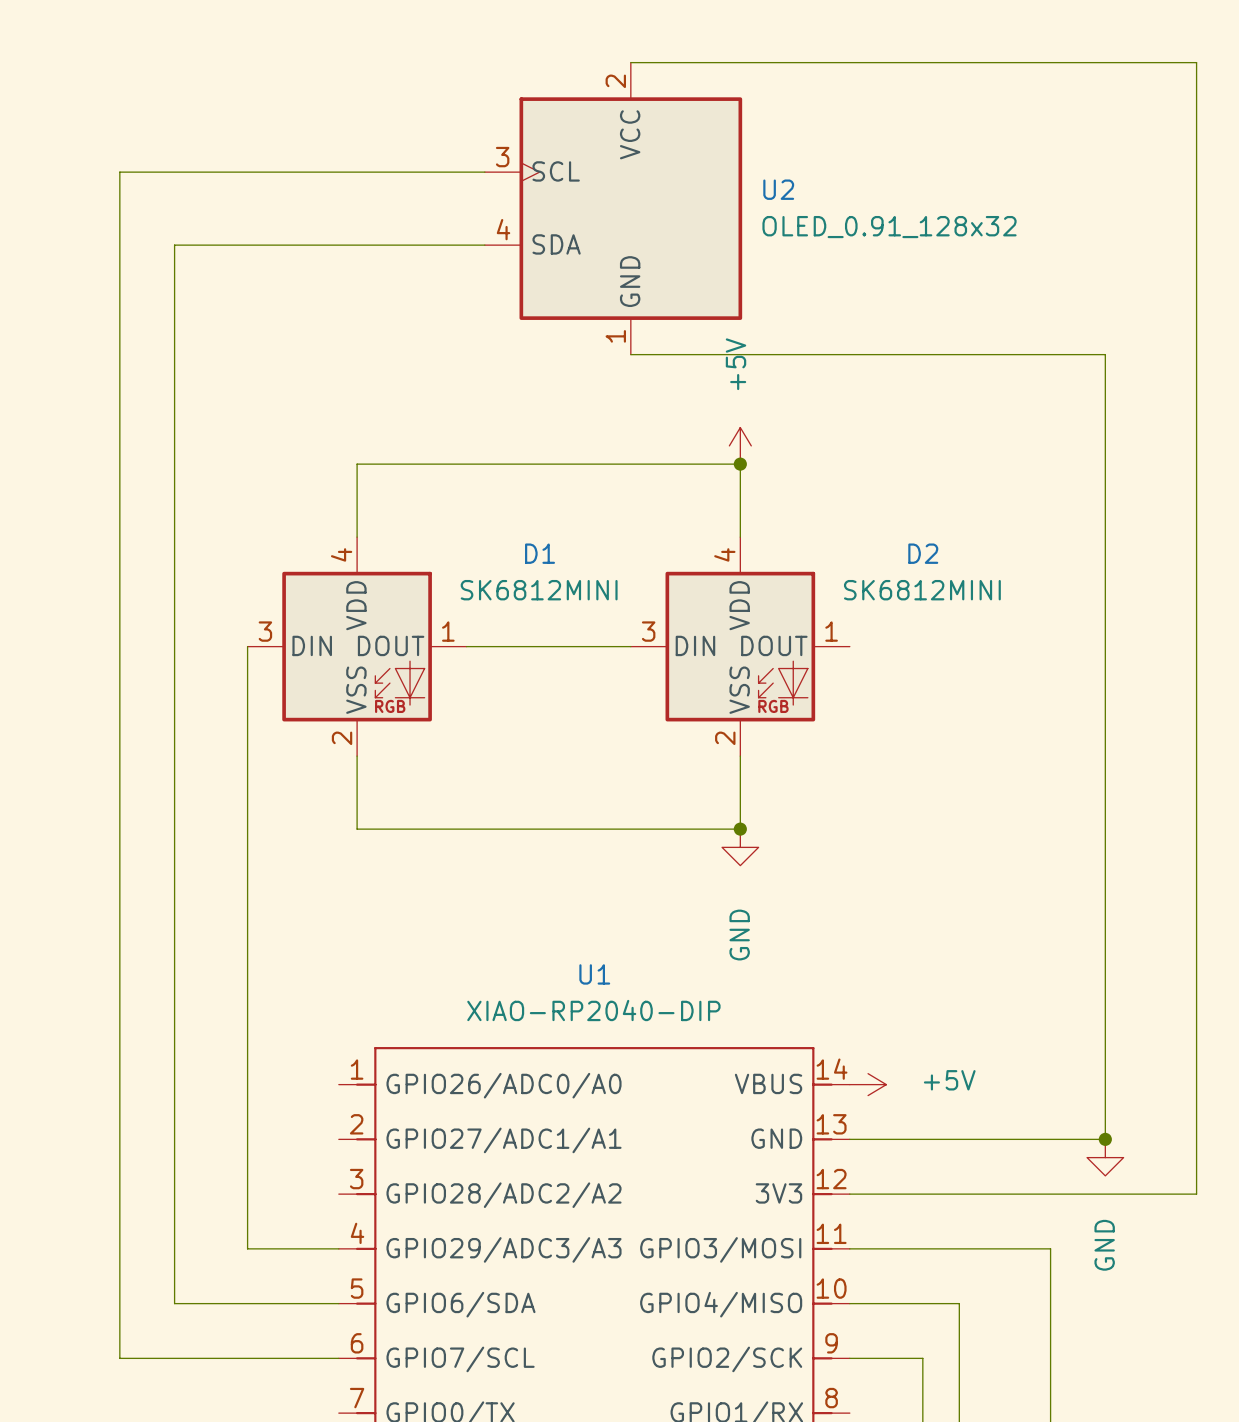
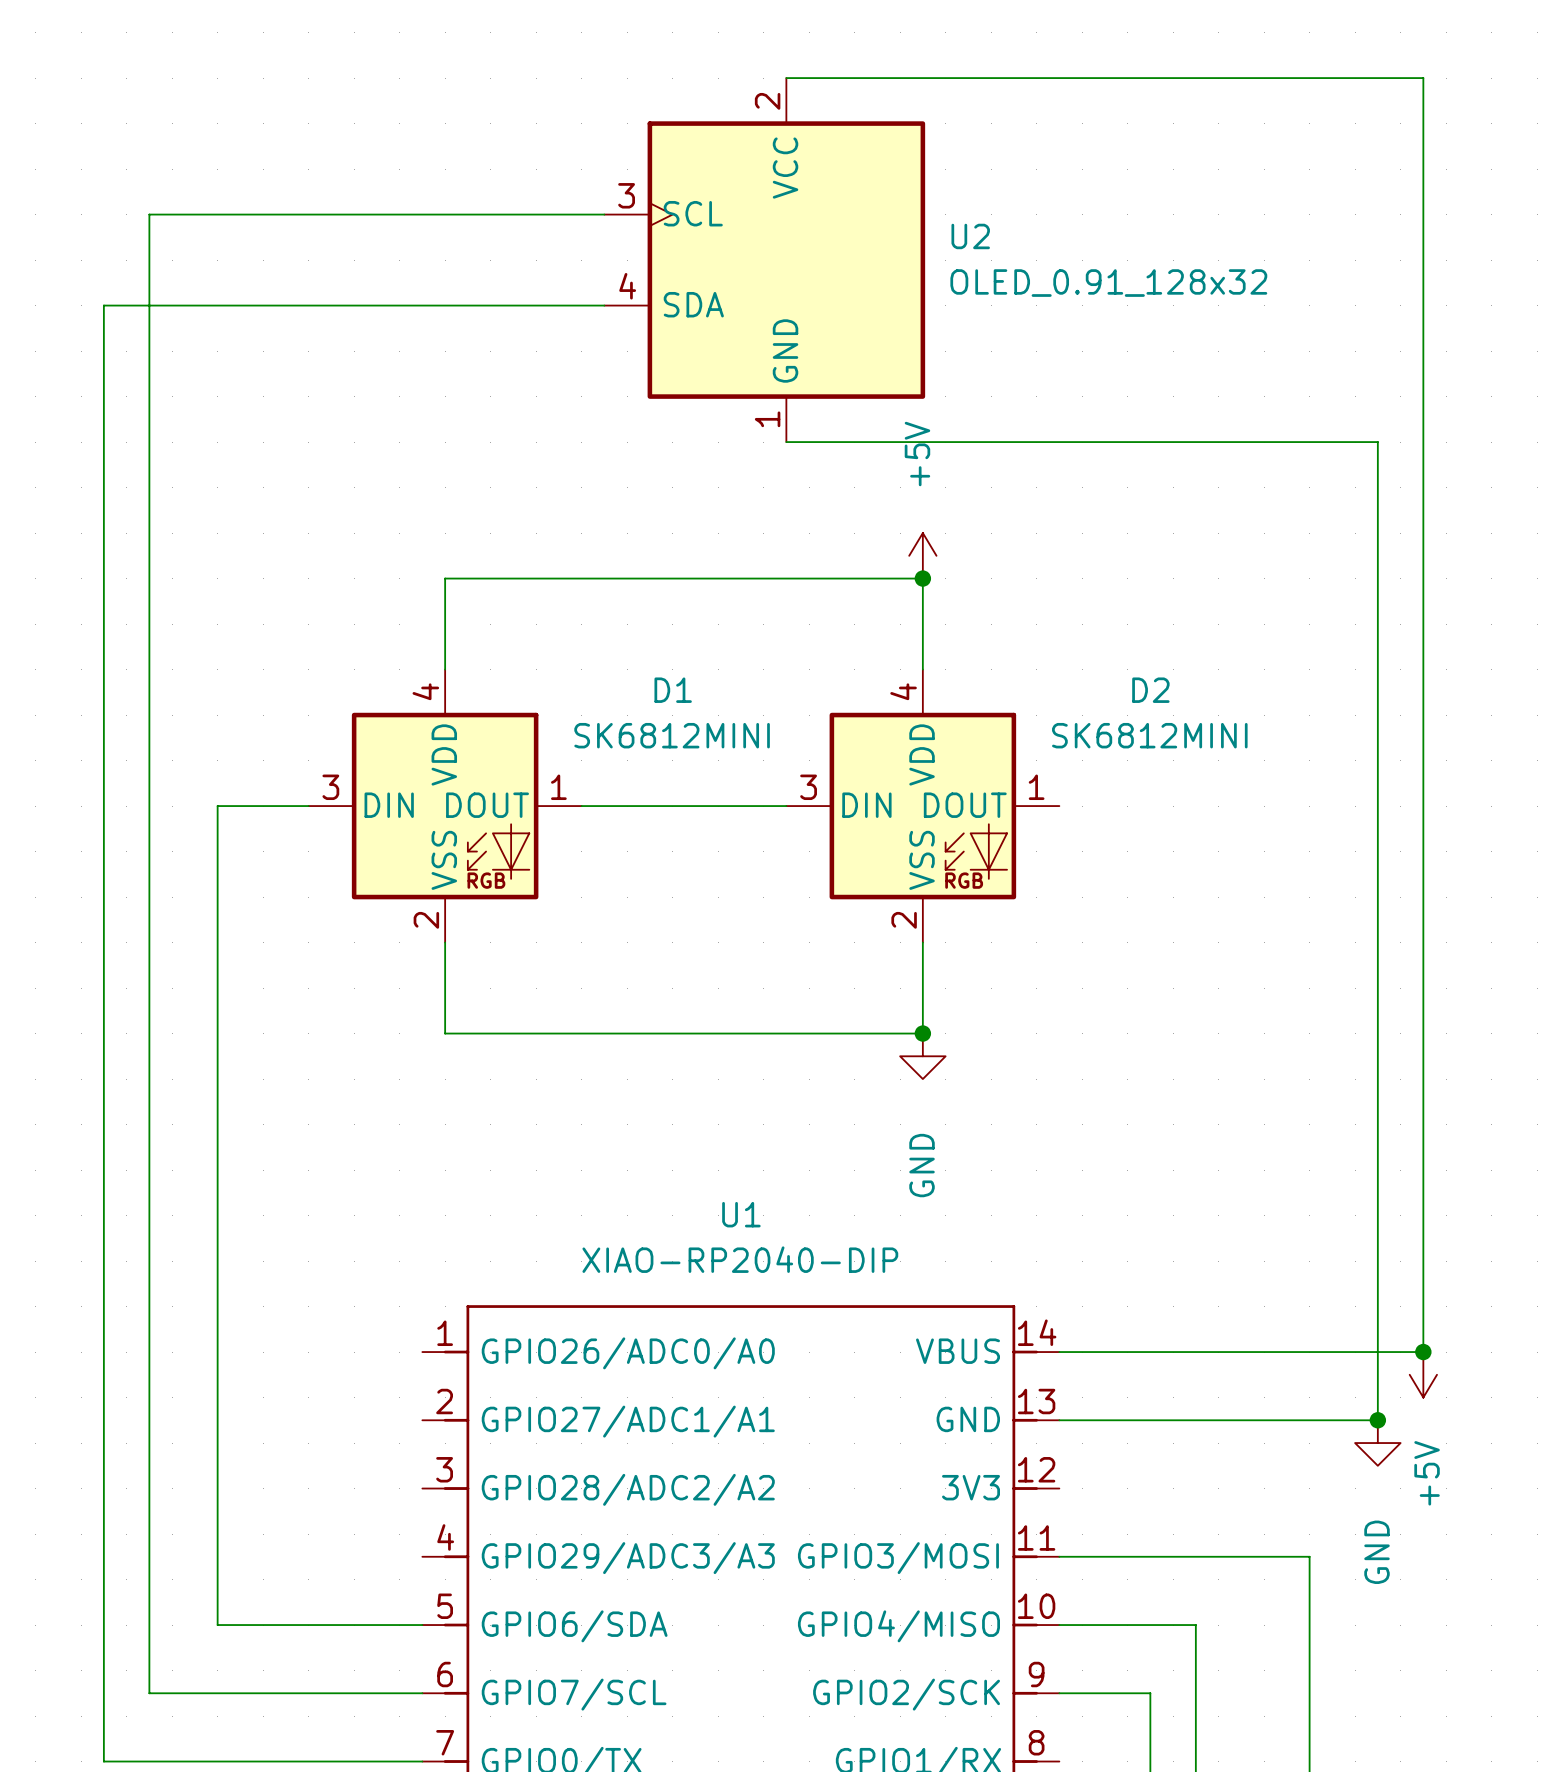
wire: (1141, 62) (1196, 62) (1196, 1194) (849, 1194) -> (1423, 78) (1423, 1352) (1059, 1352)
wire: (174, 245) (174, 646) -> (308, 806) (217, 806)
wire: none -> (217, 305) (103, 305) (103, 1761) (422, 1761)
wire: (247, 646) (247, 1248) (338, 1248) -> none
power symbol rotation: 0° (868, 1084) -> 90° clockwise (1423, 1374)
power symbol position: +5V (868, 1084) -> +5V (1423, 1374)
junction: none -> (1423, 1352)

